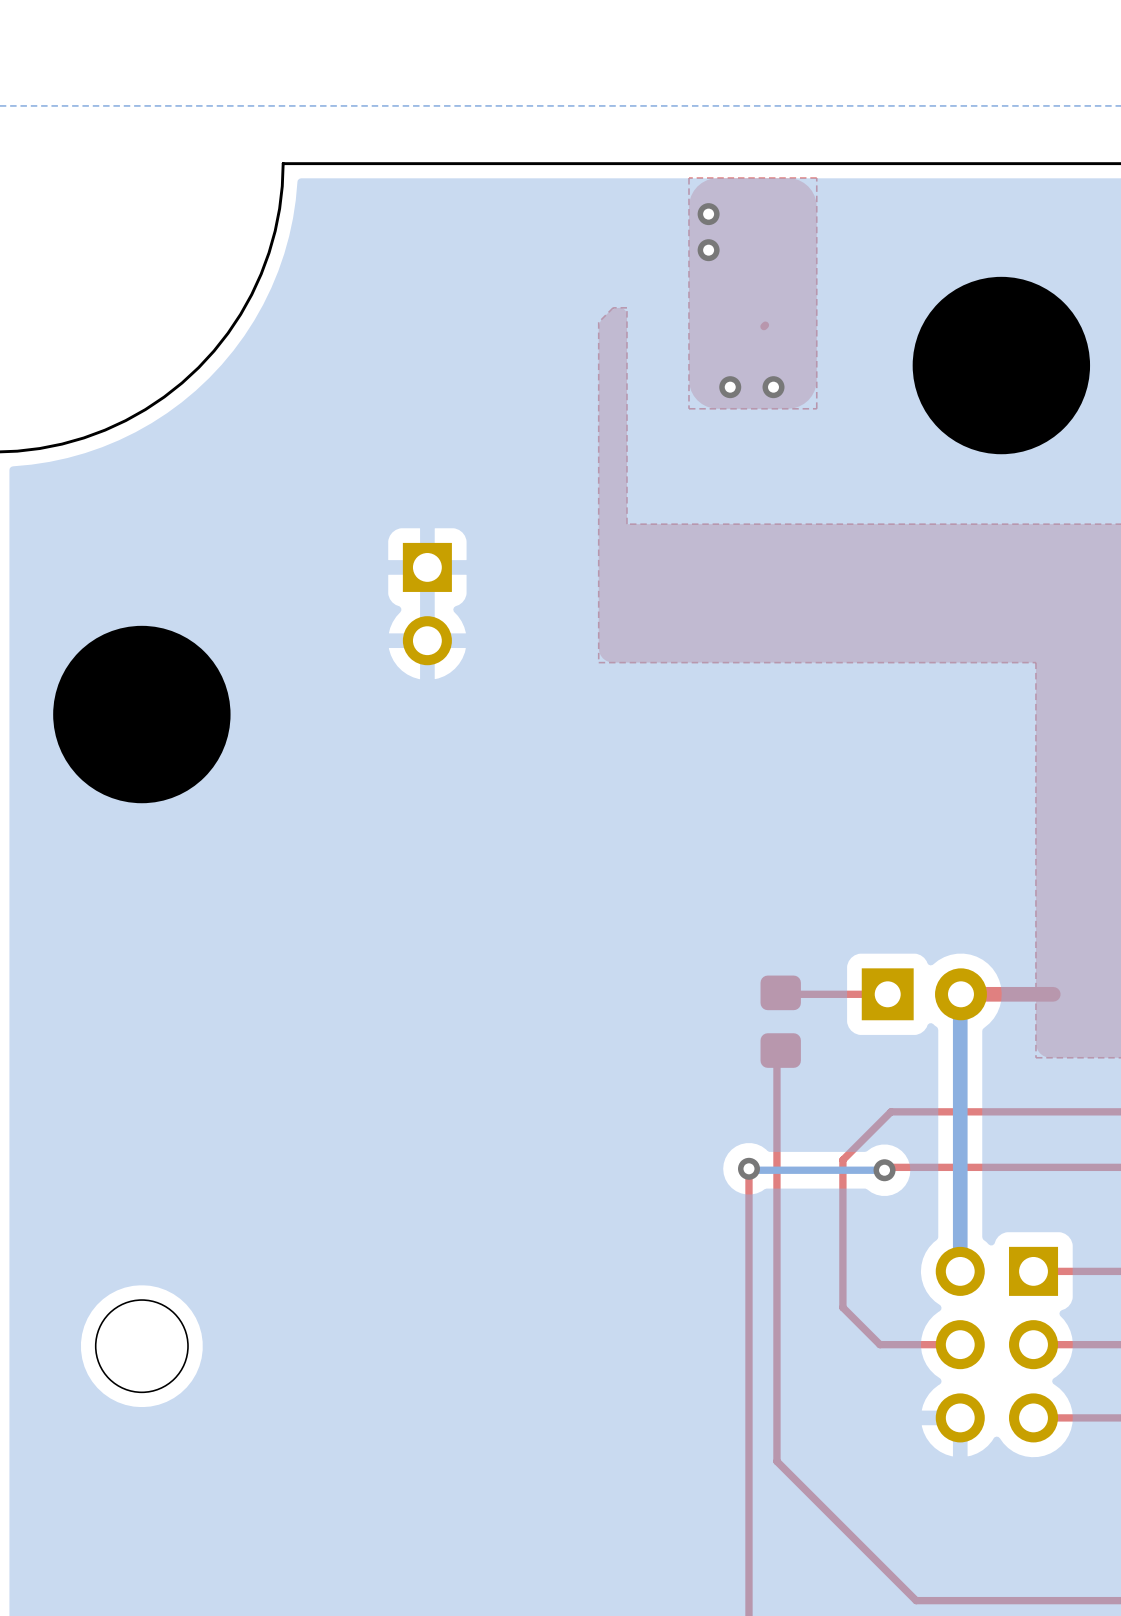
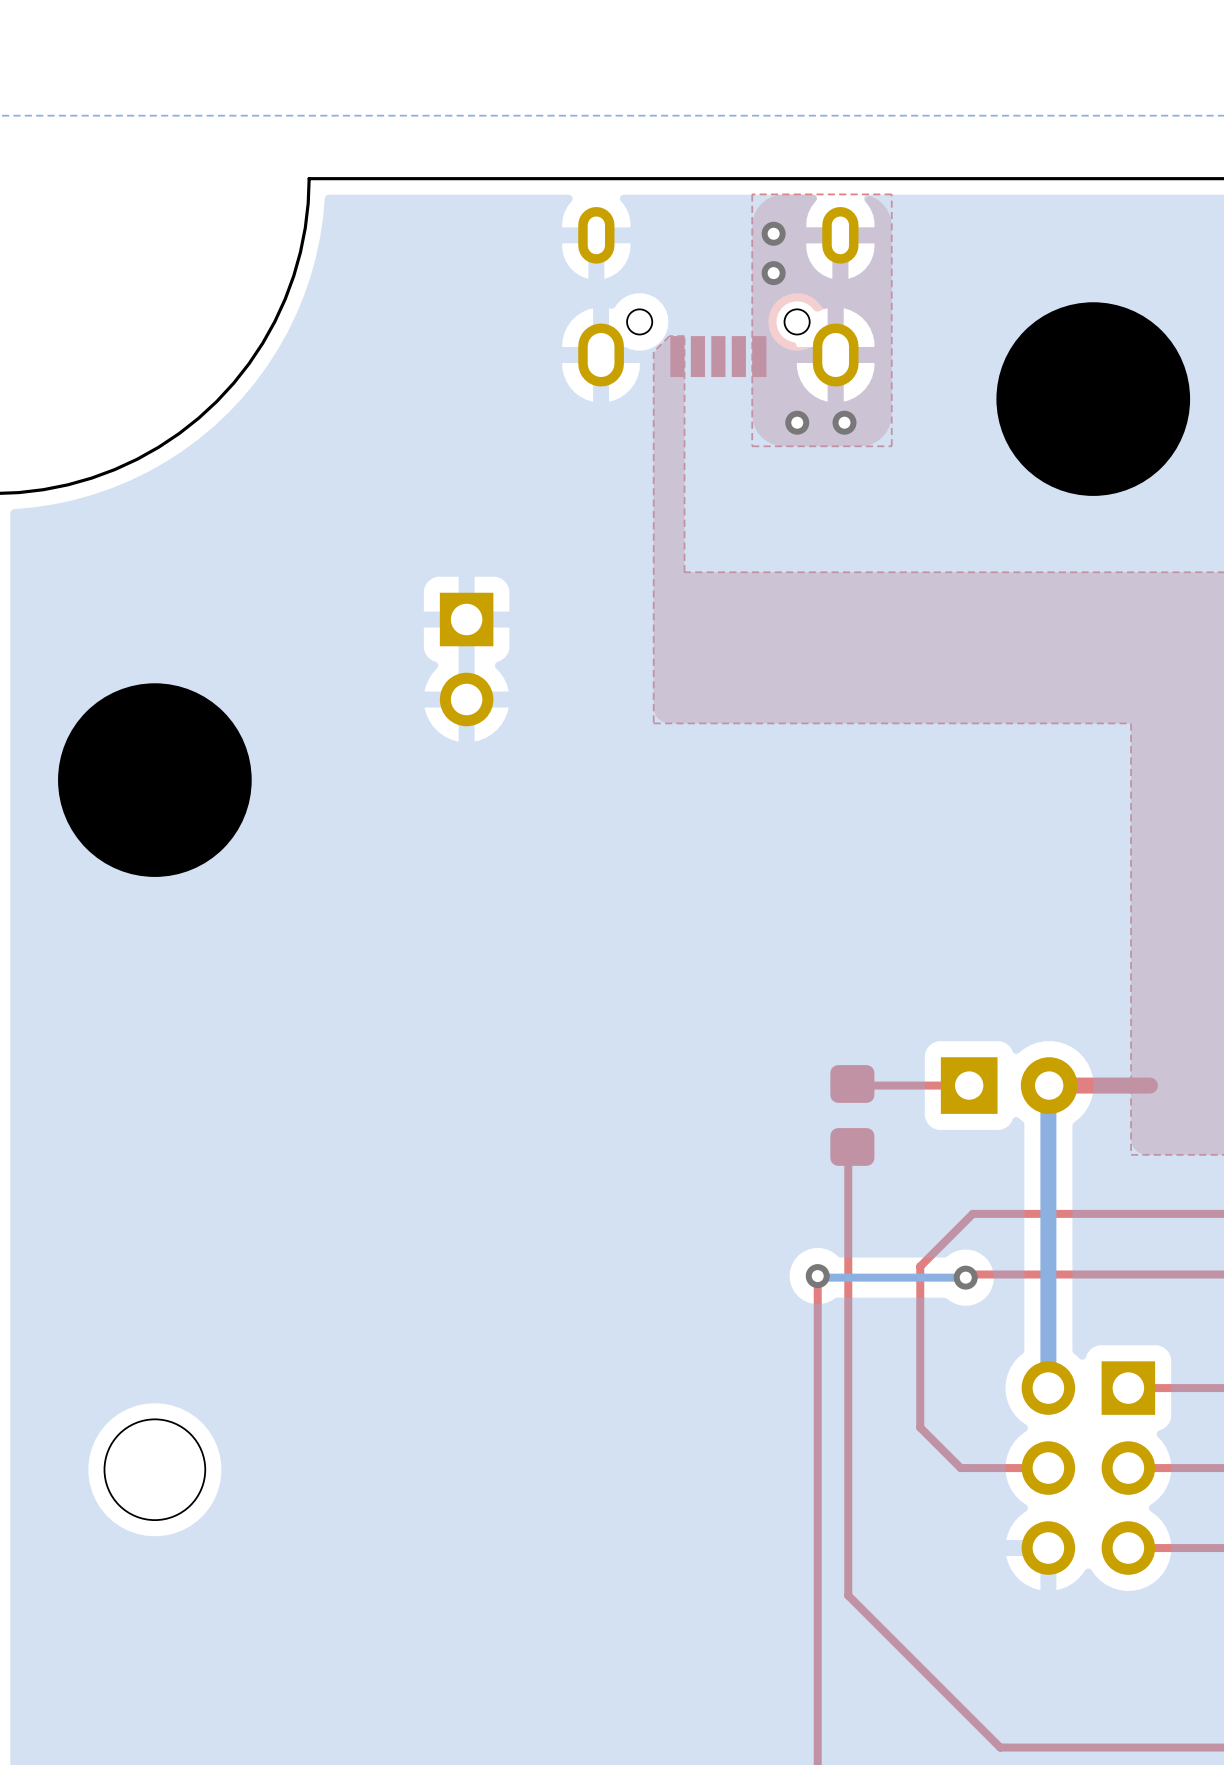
part: none -> (718, 296)

